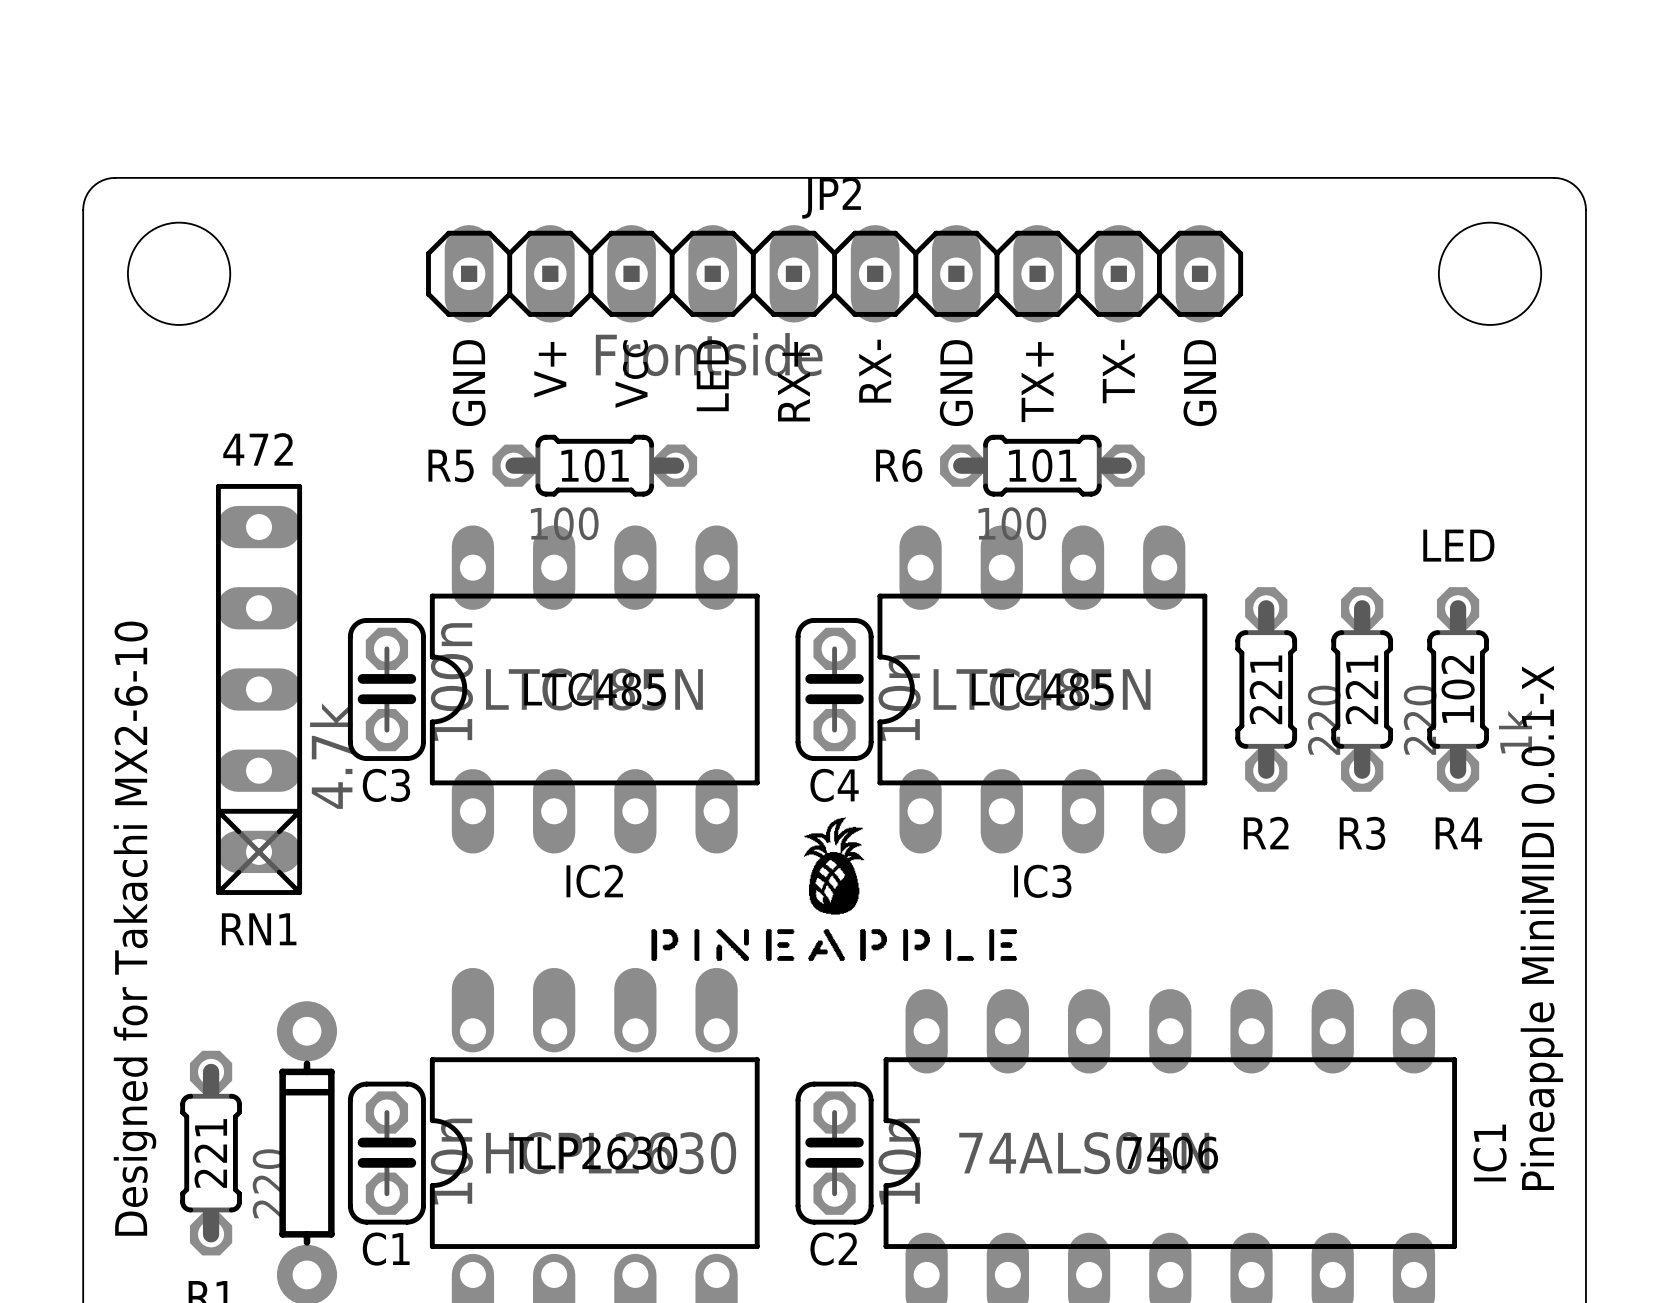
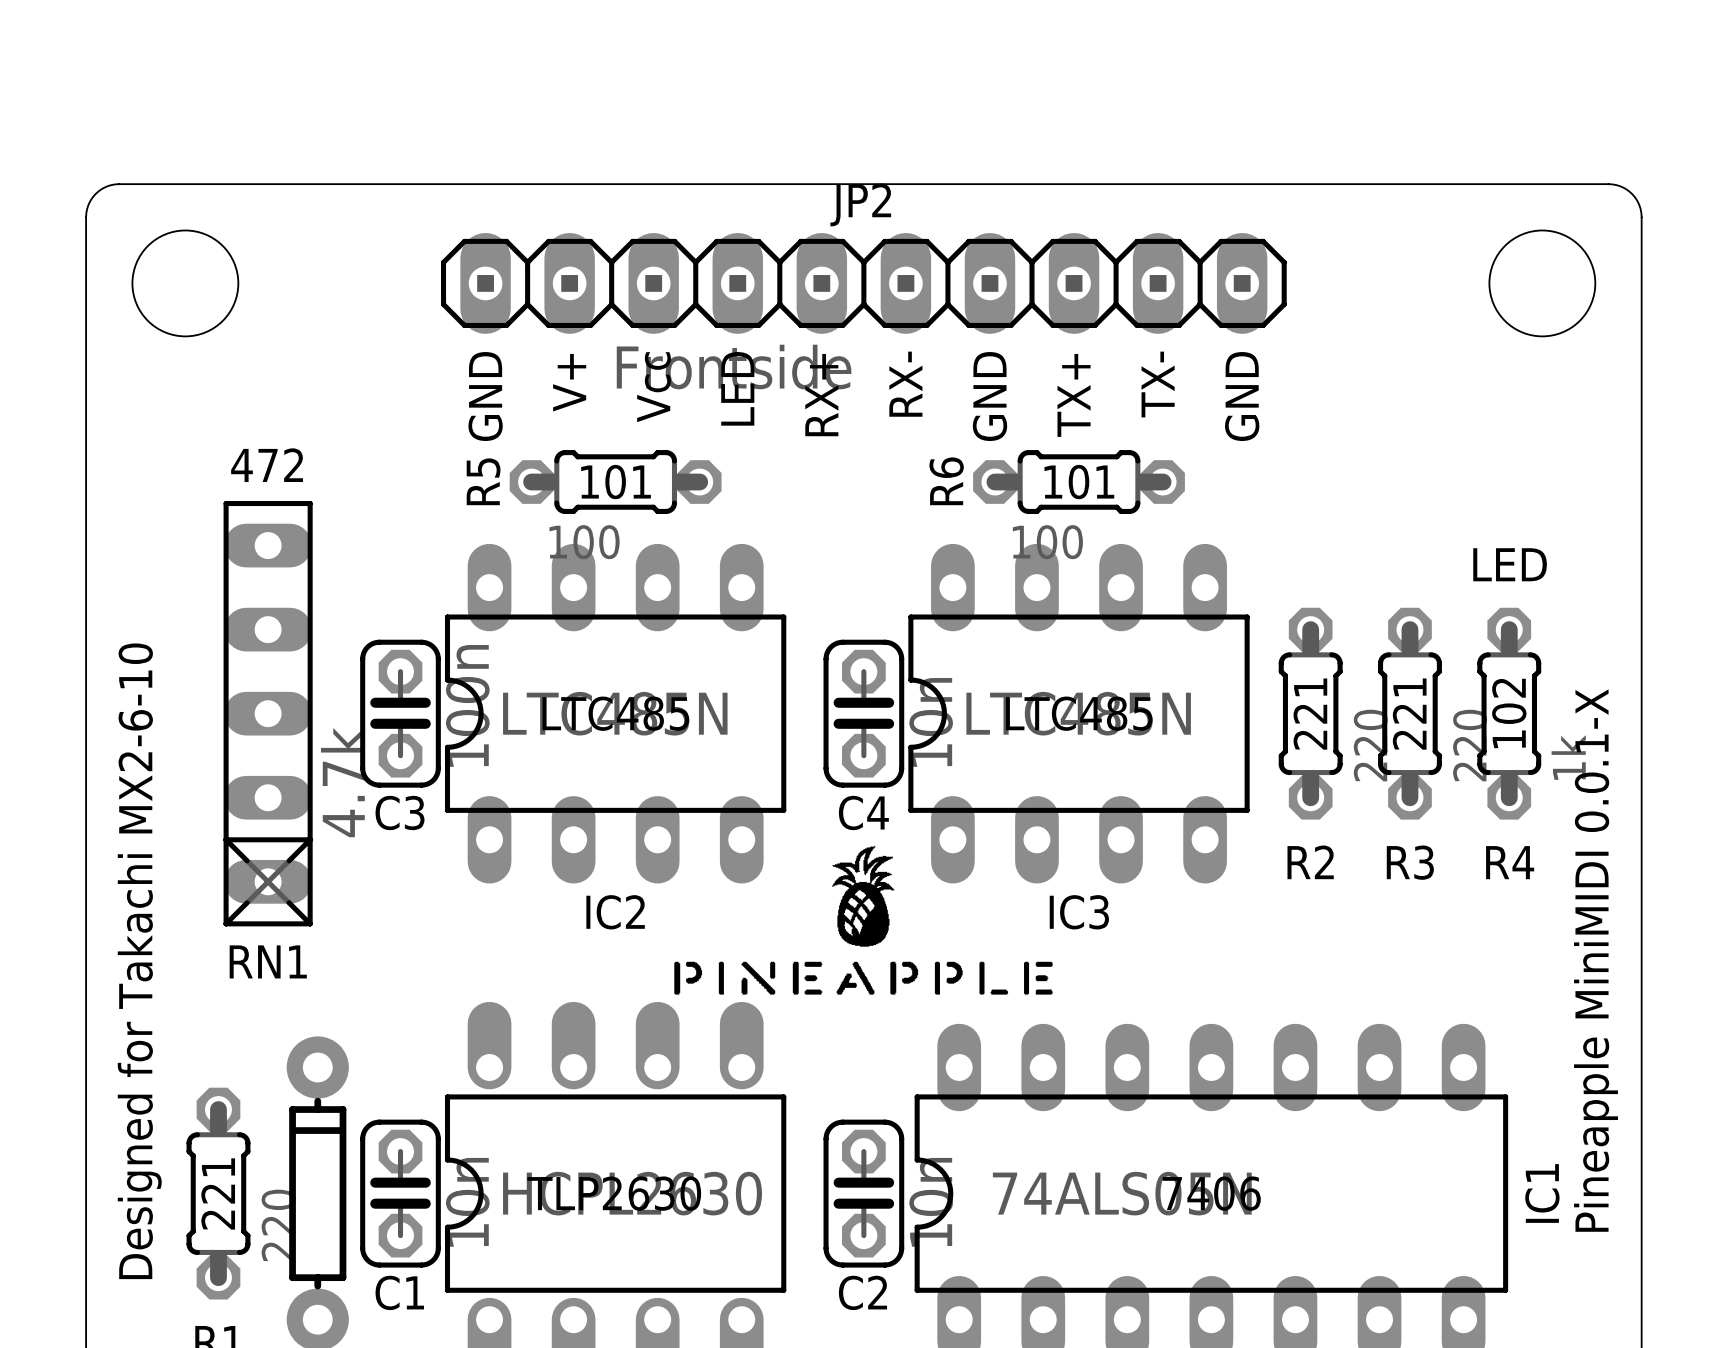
R5 name rotation: 0° (451, 465) -> 90° counterclockwise (483, 481)
R6 name rotation: 0° (899, 465) -> 90° counterclockwise (946, 481)

